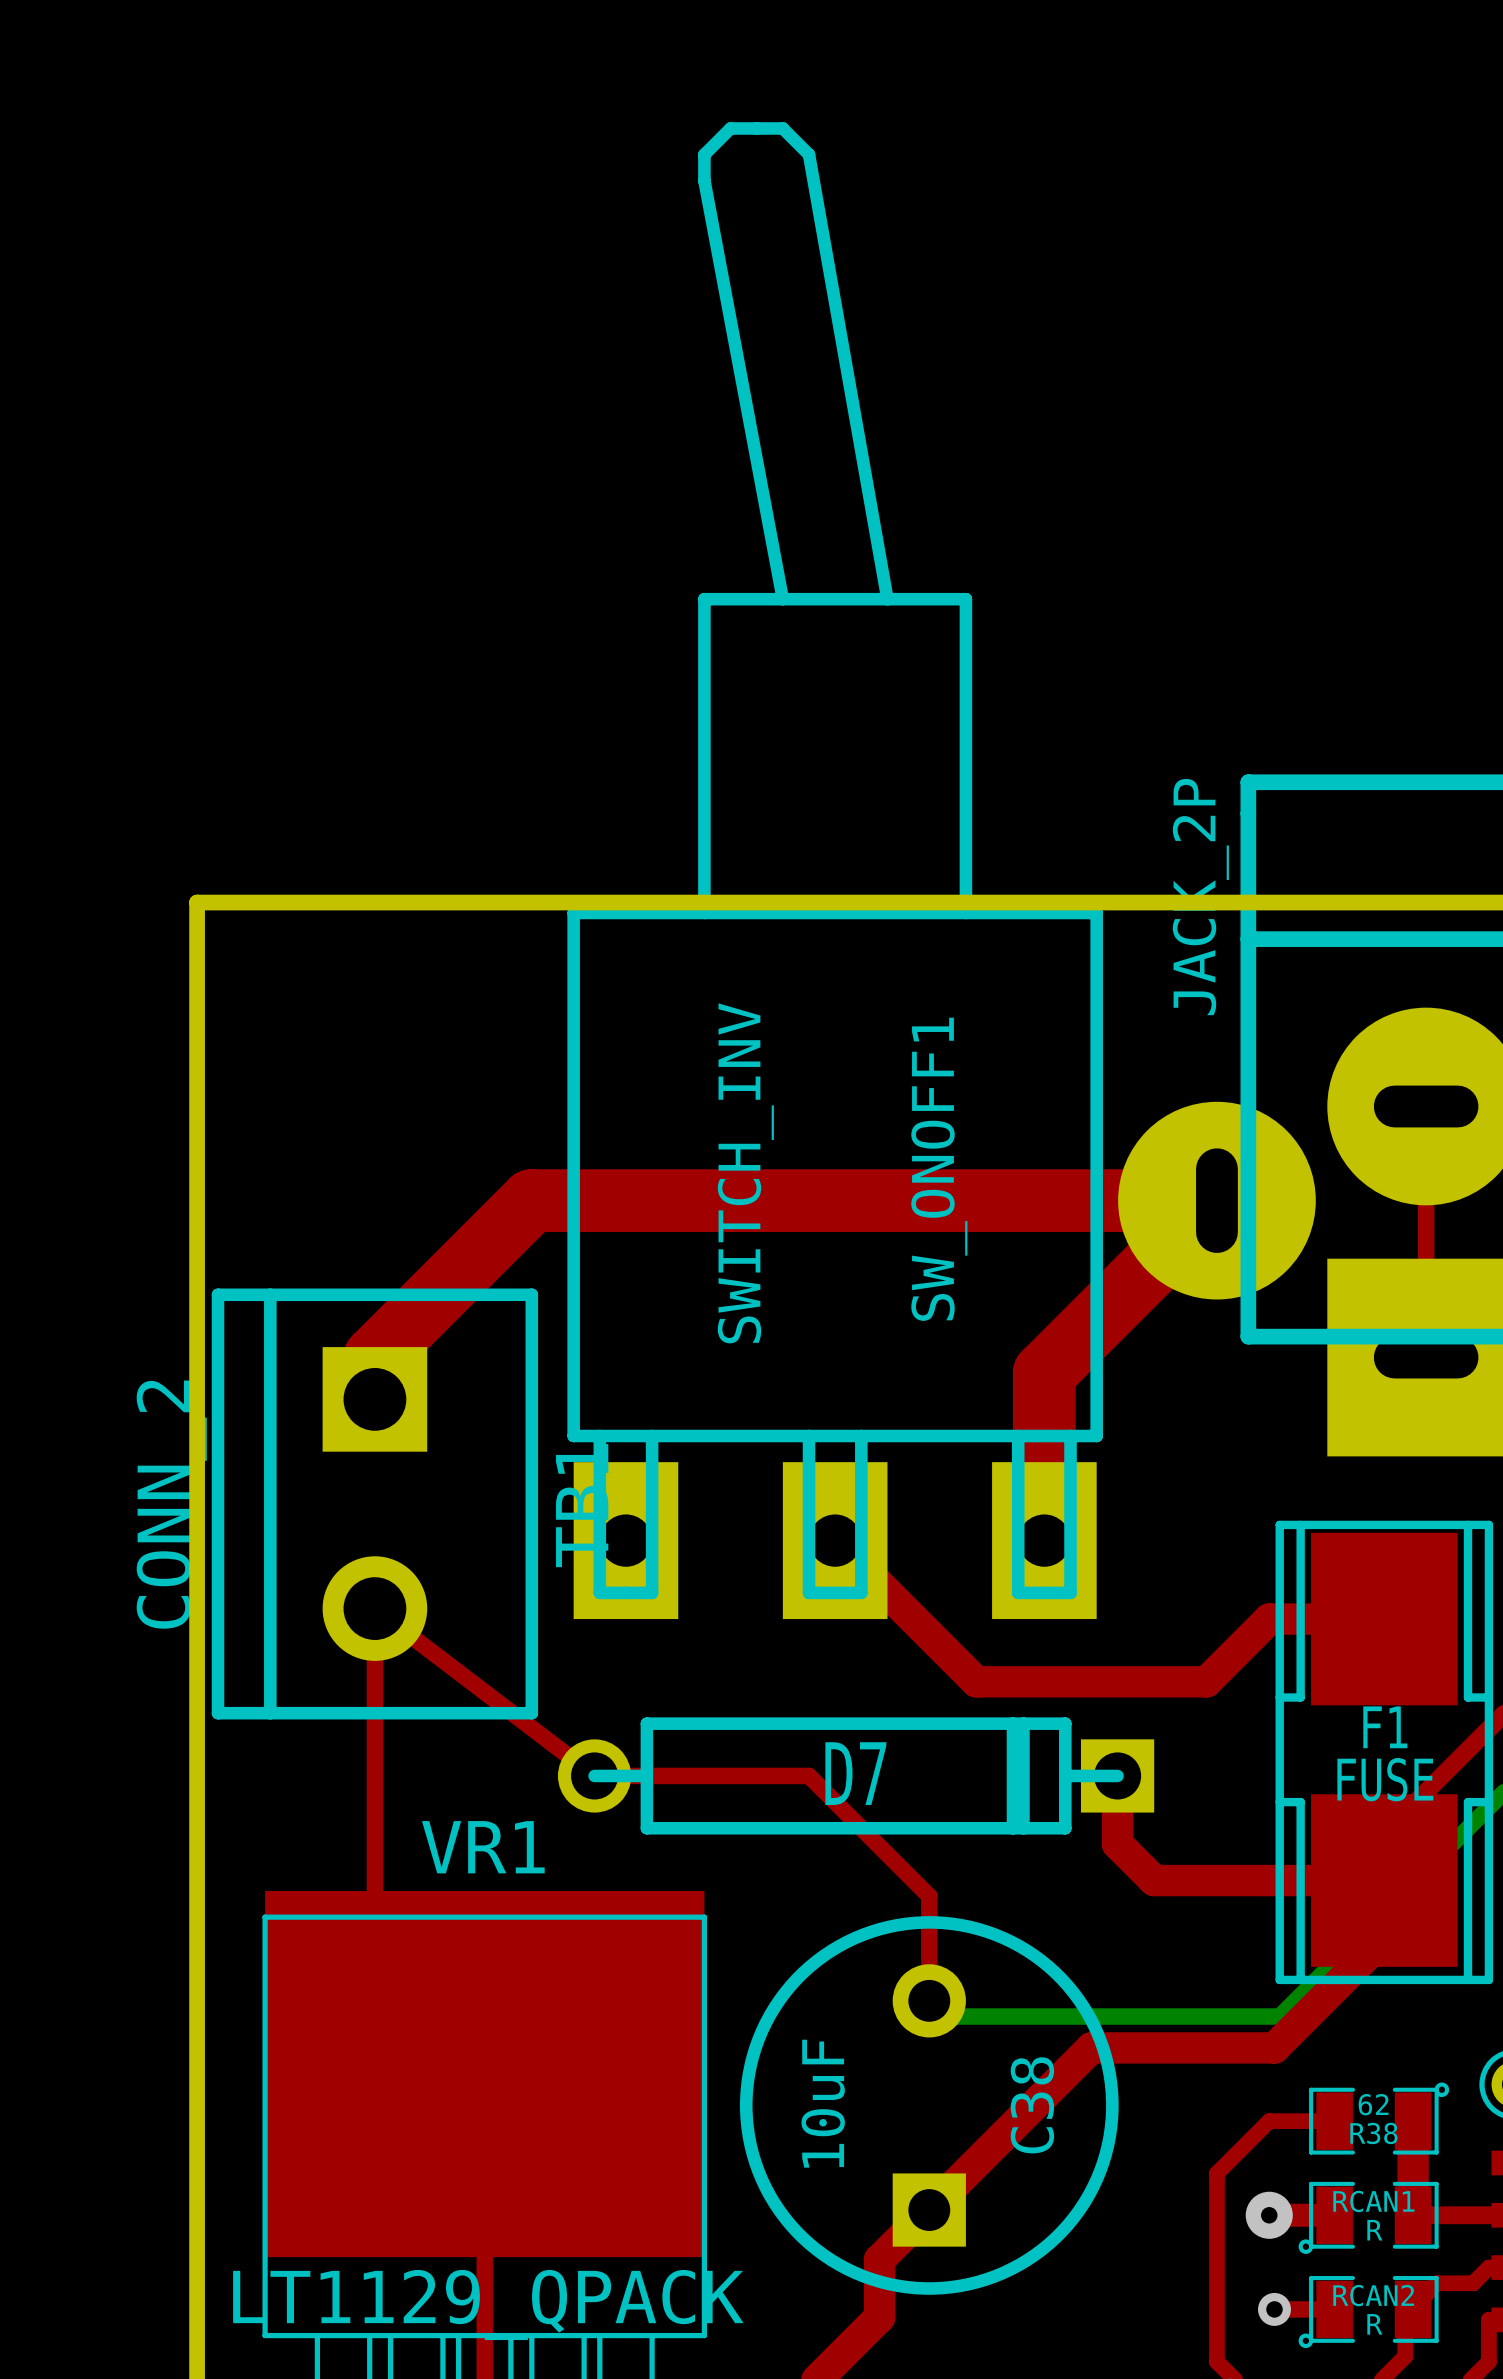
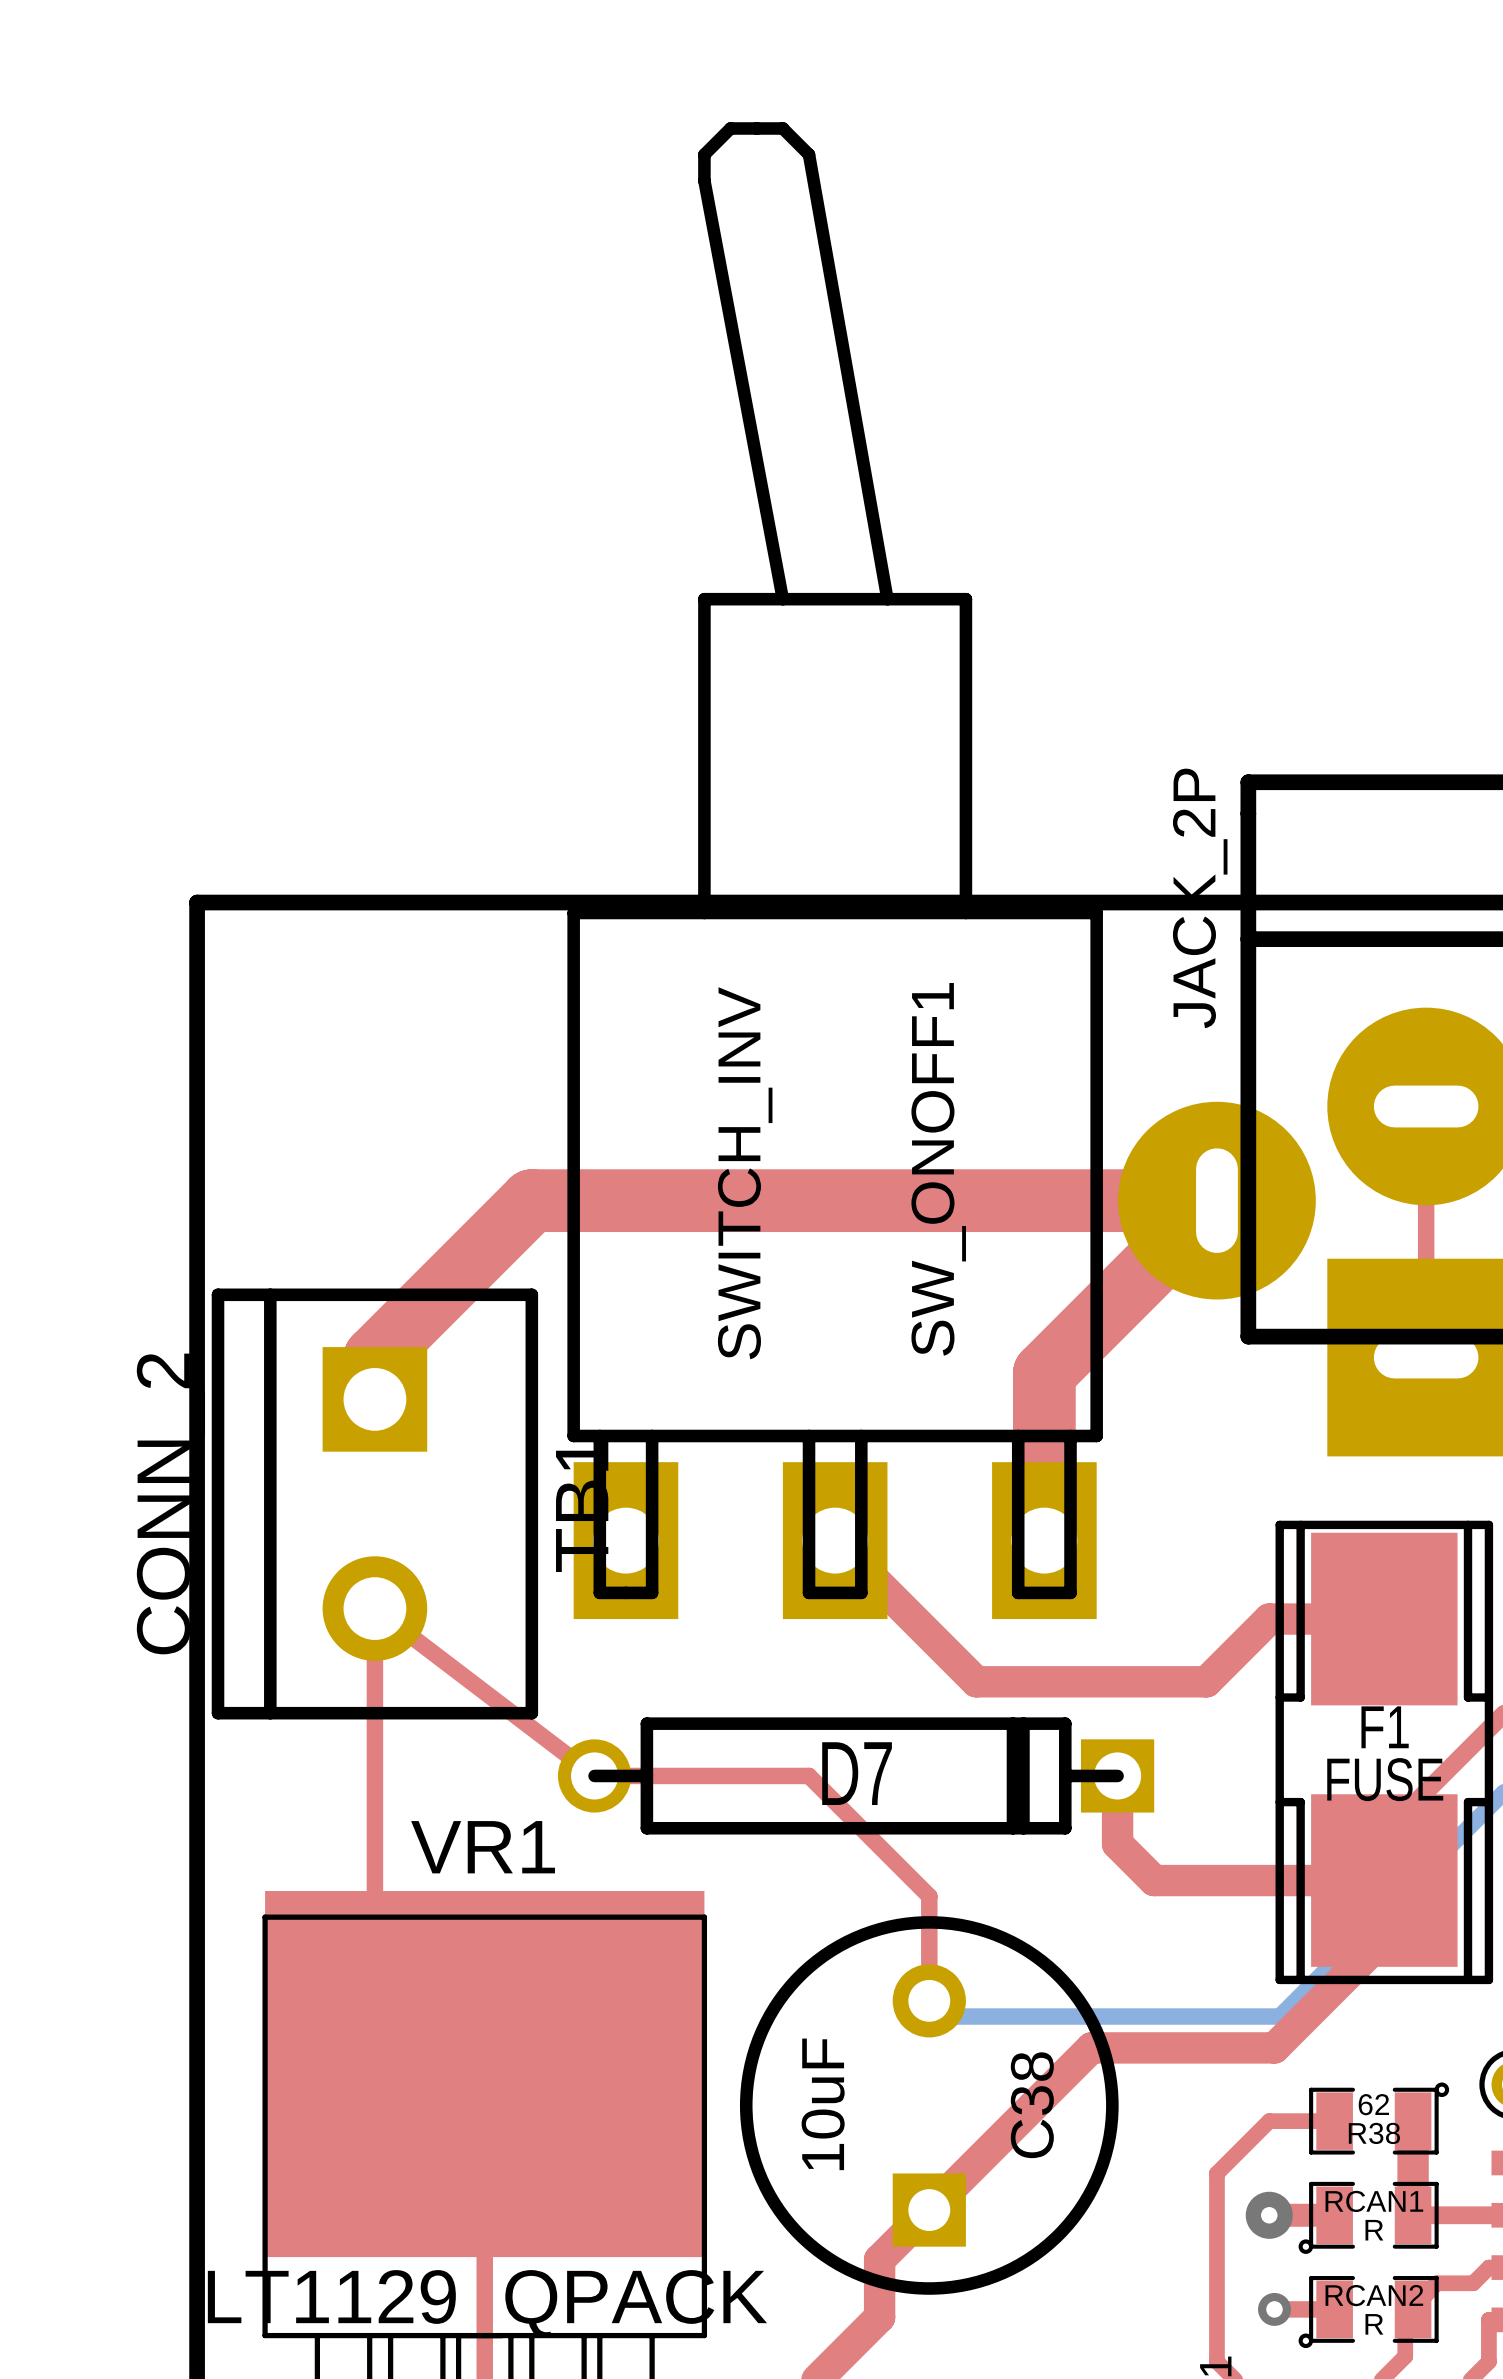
SW_ONOFF1 footprint: [567, 122, 1103, 1620] -> [567, 122, 1103, 1620]

